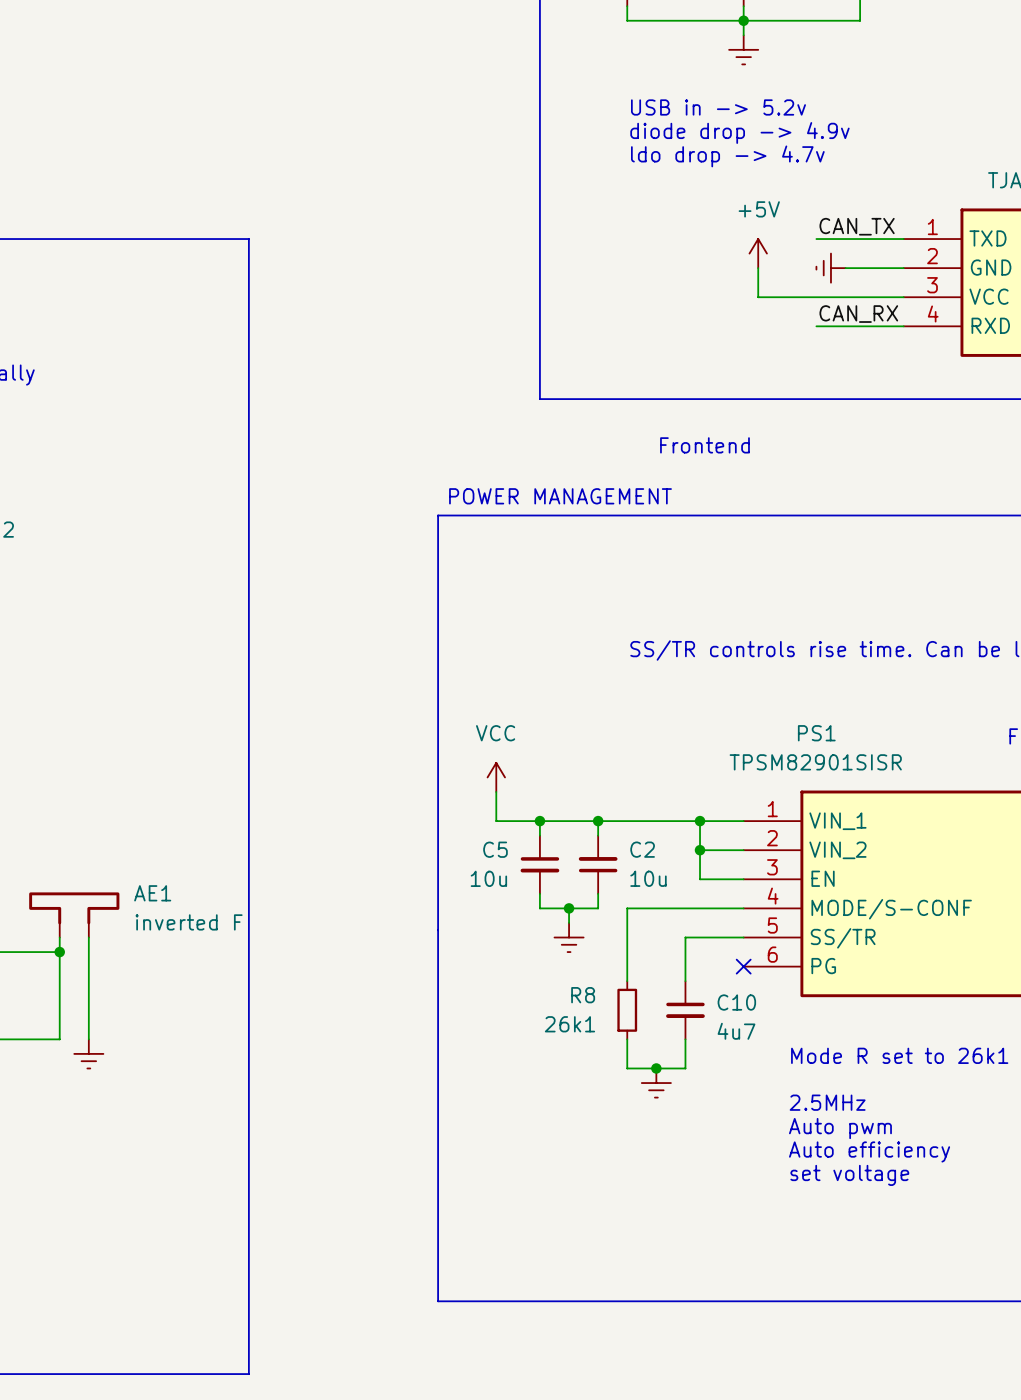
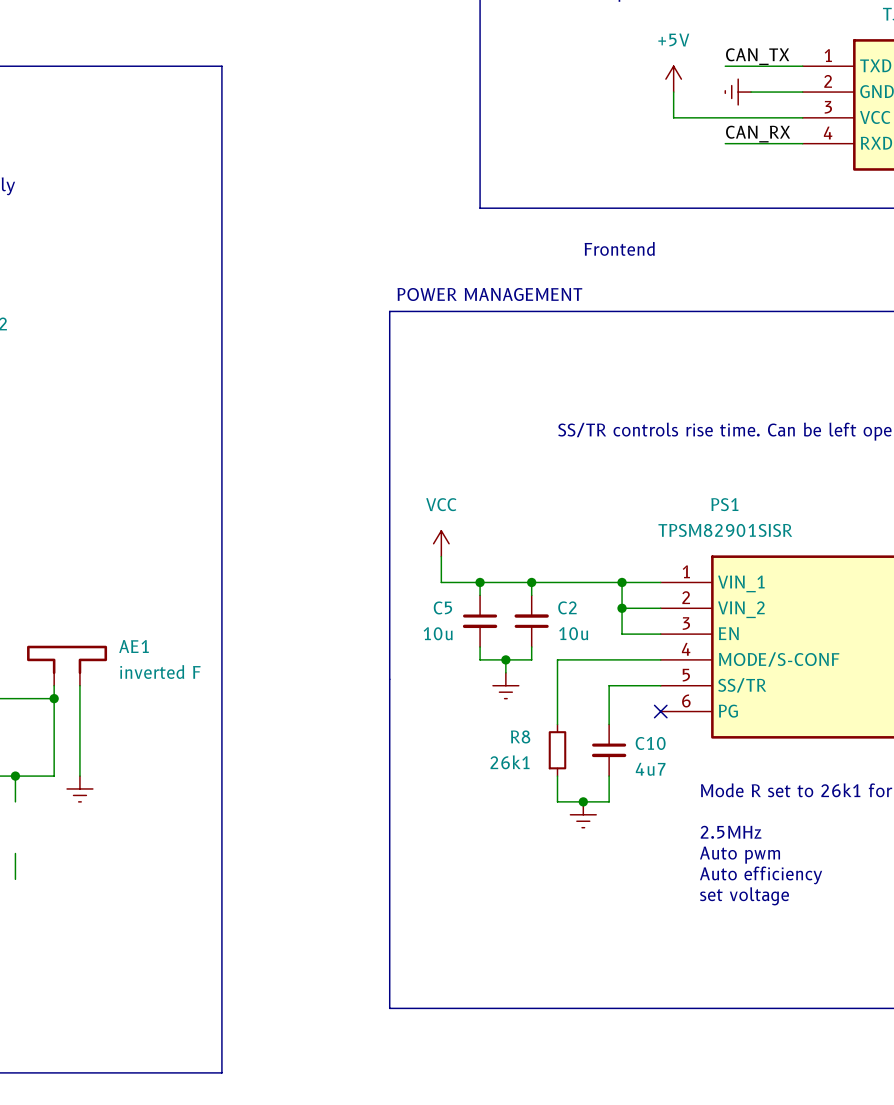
wire: none -> (15, 776) (15, 801)
junction: none -> (15, 776)
wire: none -> (15, 853) (15, 879)

